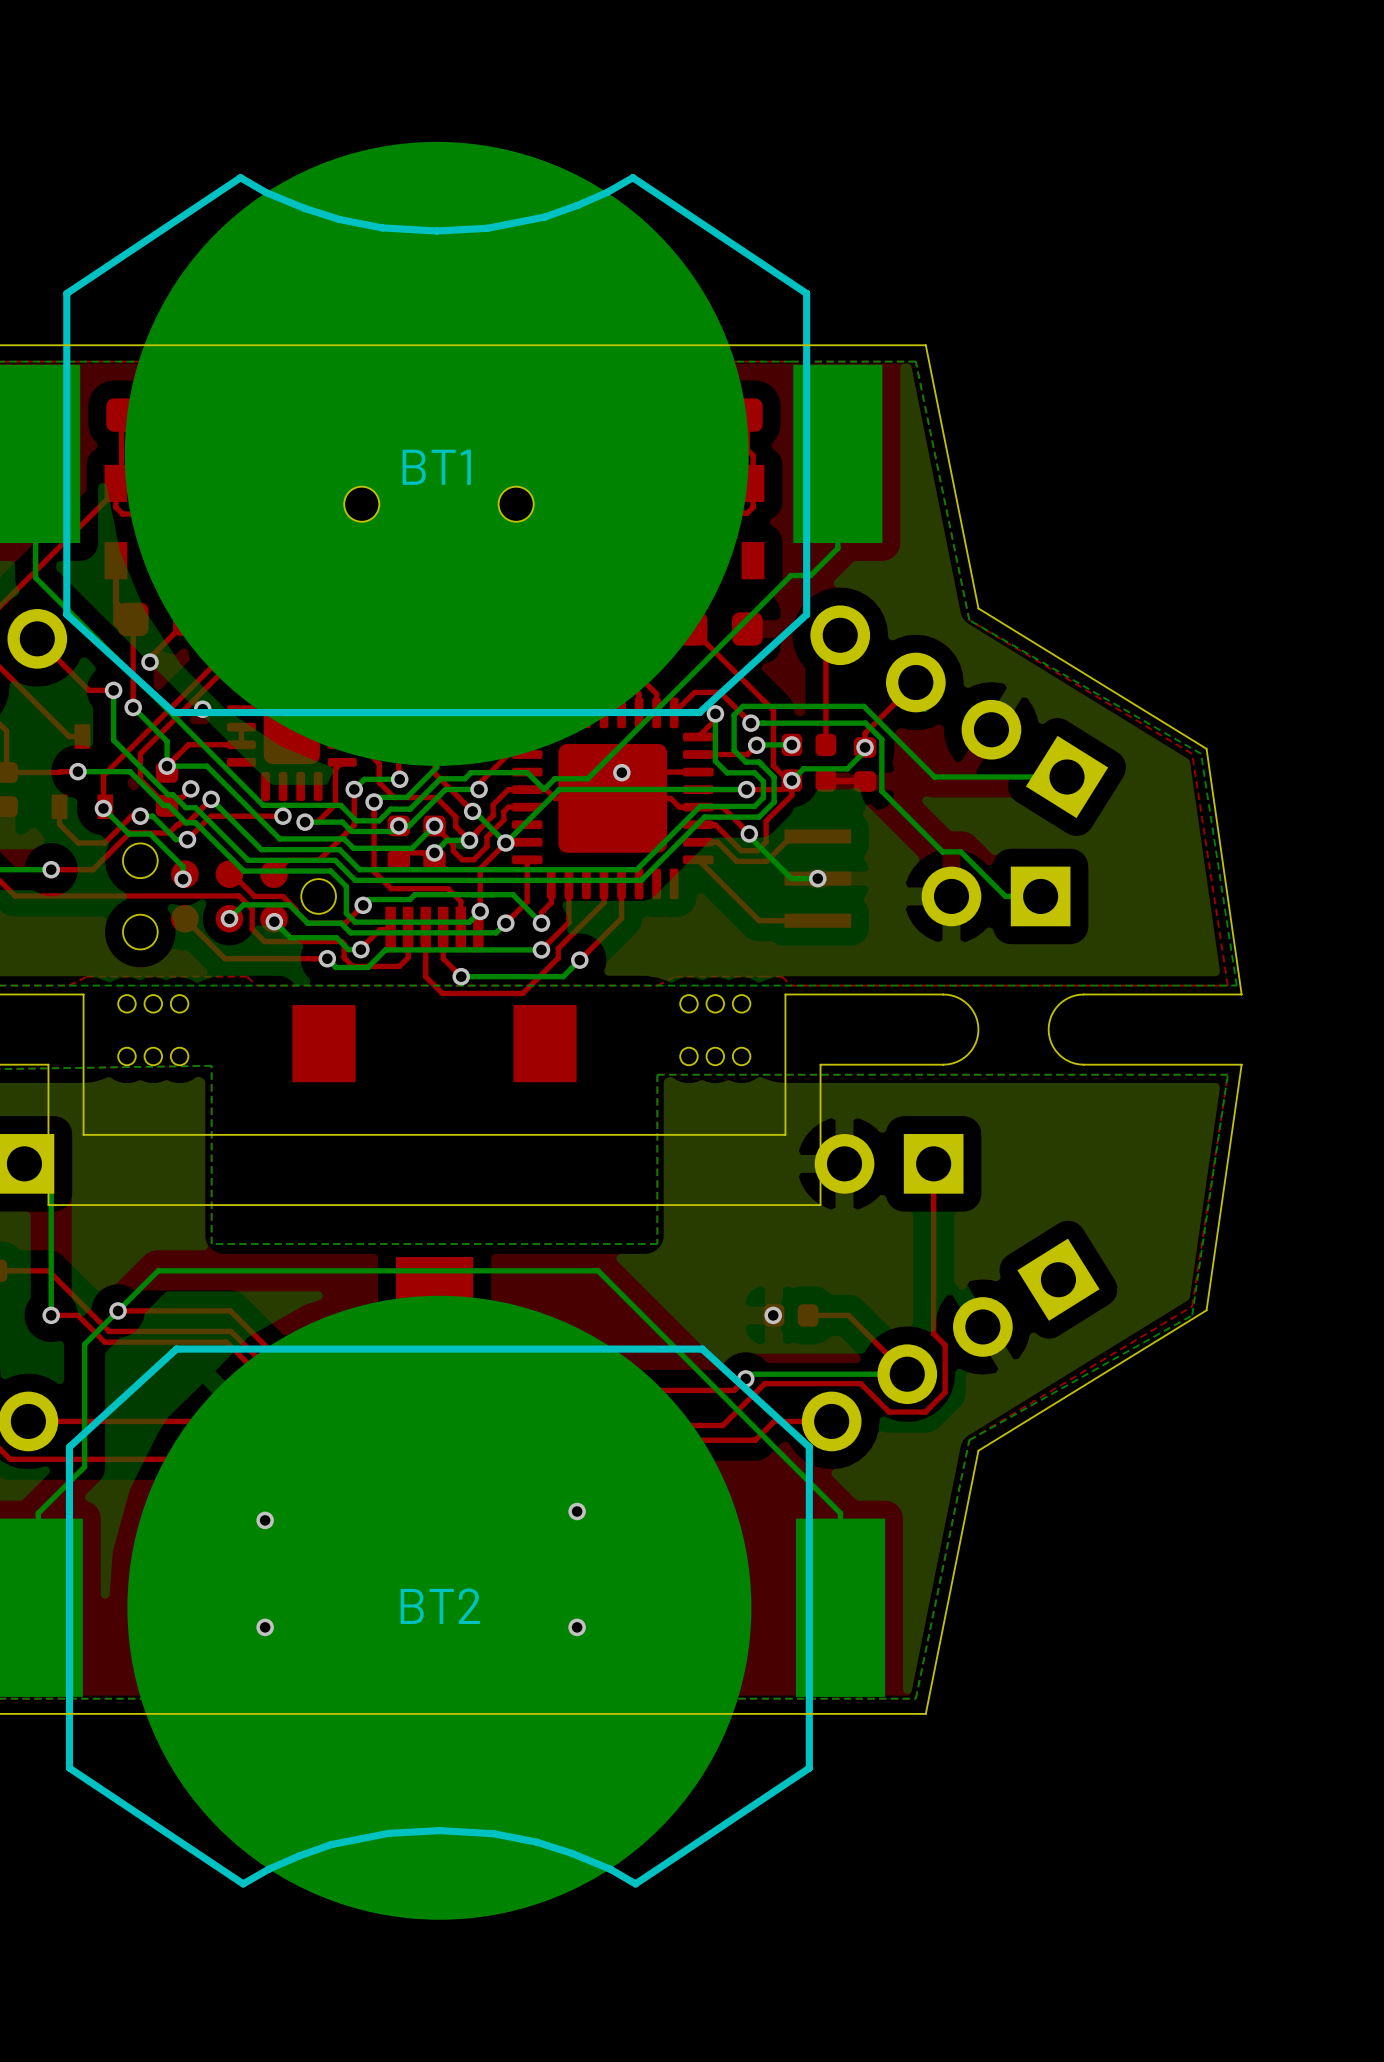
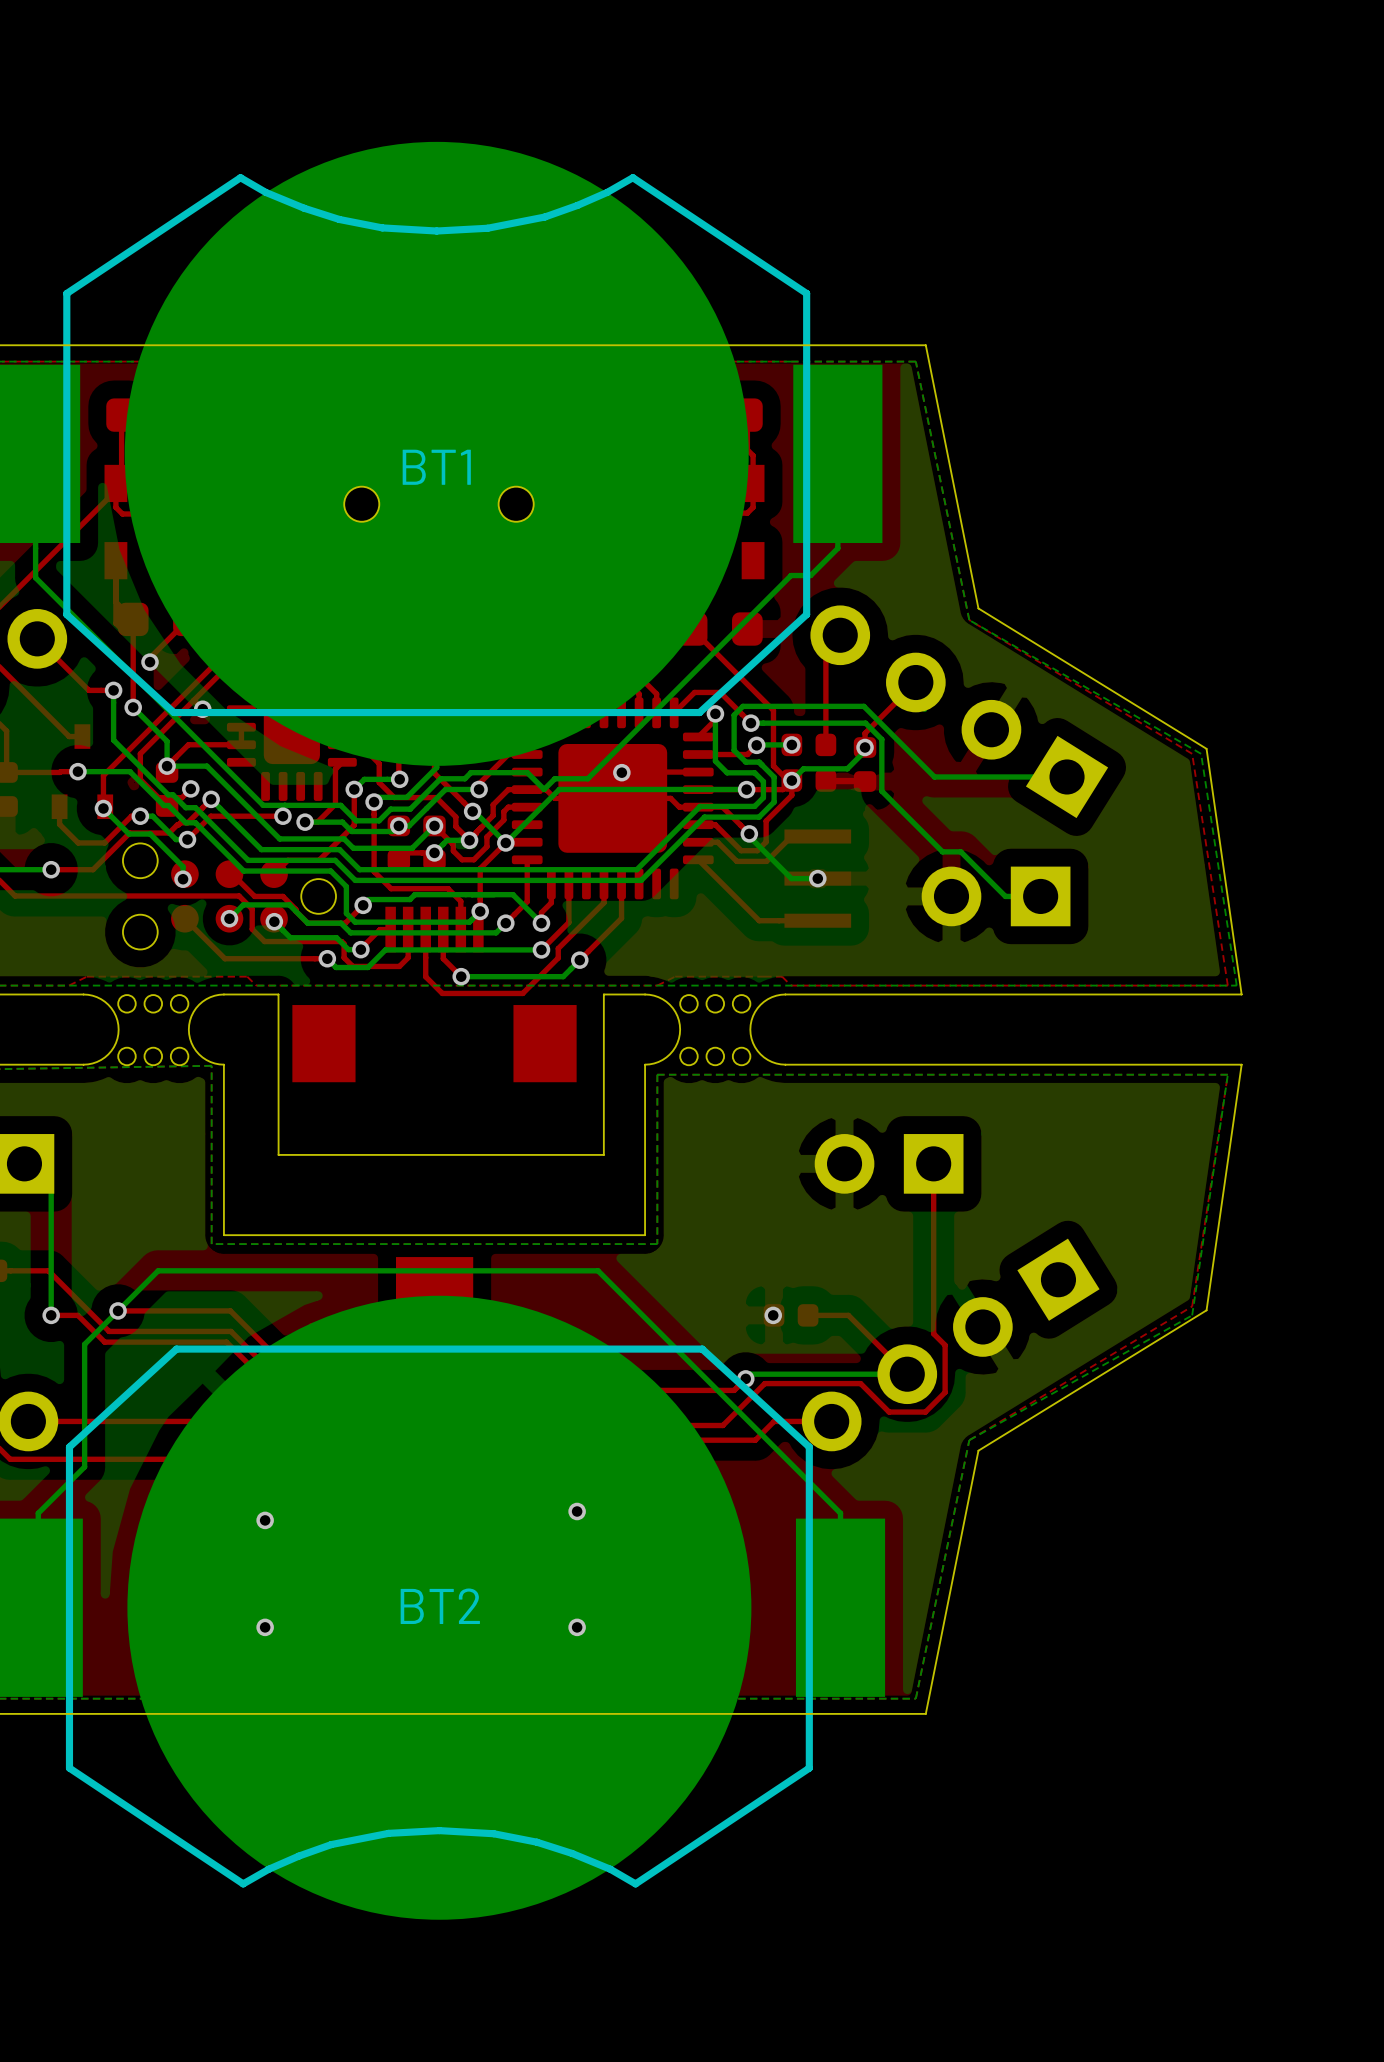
board edge: none -> (645, 994) (603, 994) (603, 1154) (278, 1154) (278, 994) (223, 994) (206, 999) (196, 1008) (191, 1016) (189, 1034) (193, 1047) (202, 1057) (210, 1062) (223, 1064) (223, 1235) (645, 1235) (645, 1064) (658, 1062) (669, 1054) (677, 1043) (680, 1029) (677, 1016) (669, 1004) (658, 997) (645, 994)
board edge: (785, 994) (785, 1134) (83, 1134) (83, 994) -> (785, 994) (767, 999) (755, 1012) (750, 1029) (755, 1047) (764, 1057) (776, 1063) (820, 1064)
board edge: (943, 994) (956, 997) (968, 1004) (975, 1016) (978, 1029) (975, 1043) (968, 1054) (956, 1062) (943, 1064) -> (1083, 1064) (943, 1064)
board edge: (1083, 994) (1070, 997) (1058, 1004) (1051, 1016) (1048, 1029) (1051, 1043) (1058, 1054) (1070, 1062) (1083, 1064) -> (1083, 994) (943, 994)
board edge: (820, 1064) (820, 1205) (48, 1205) (48, 1064) -> (83, 994) (101, 999) (113, 1012) (118, 1029) (113, 1047) (104, 1057) (92, 1063) (48, 1064)

